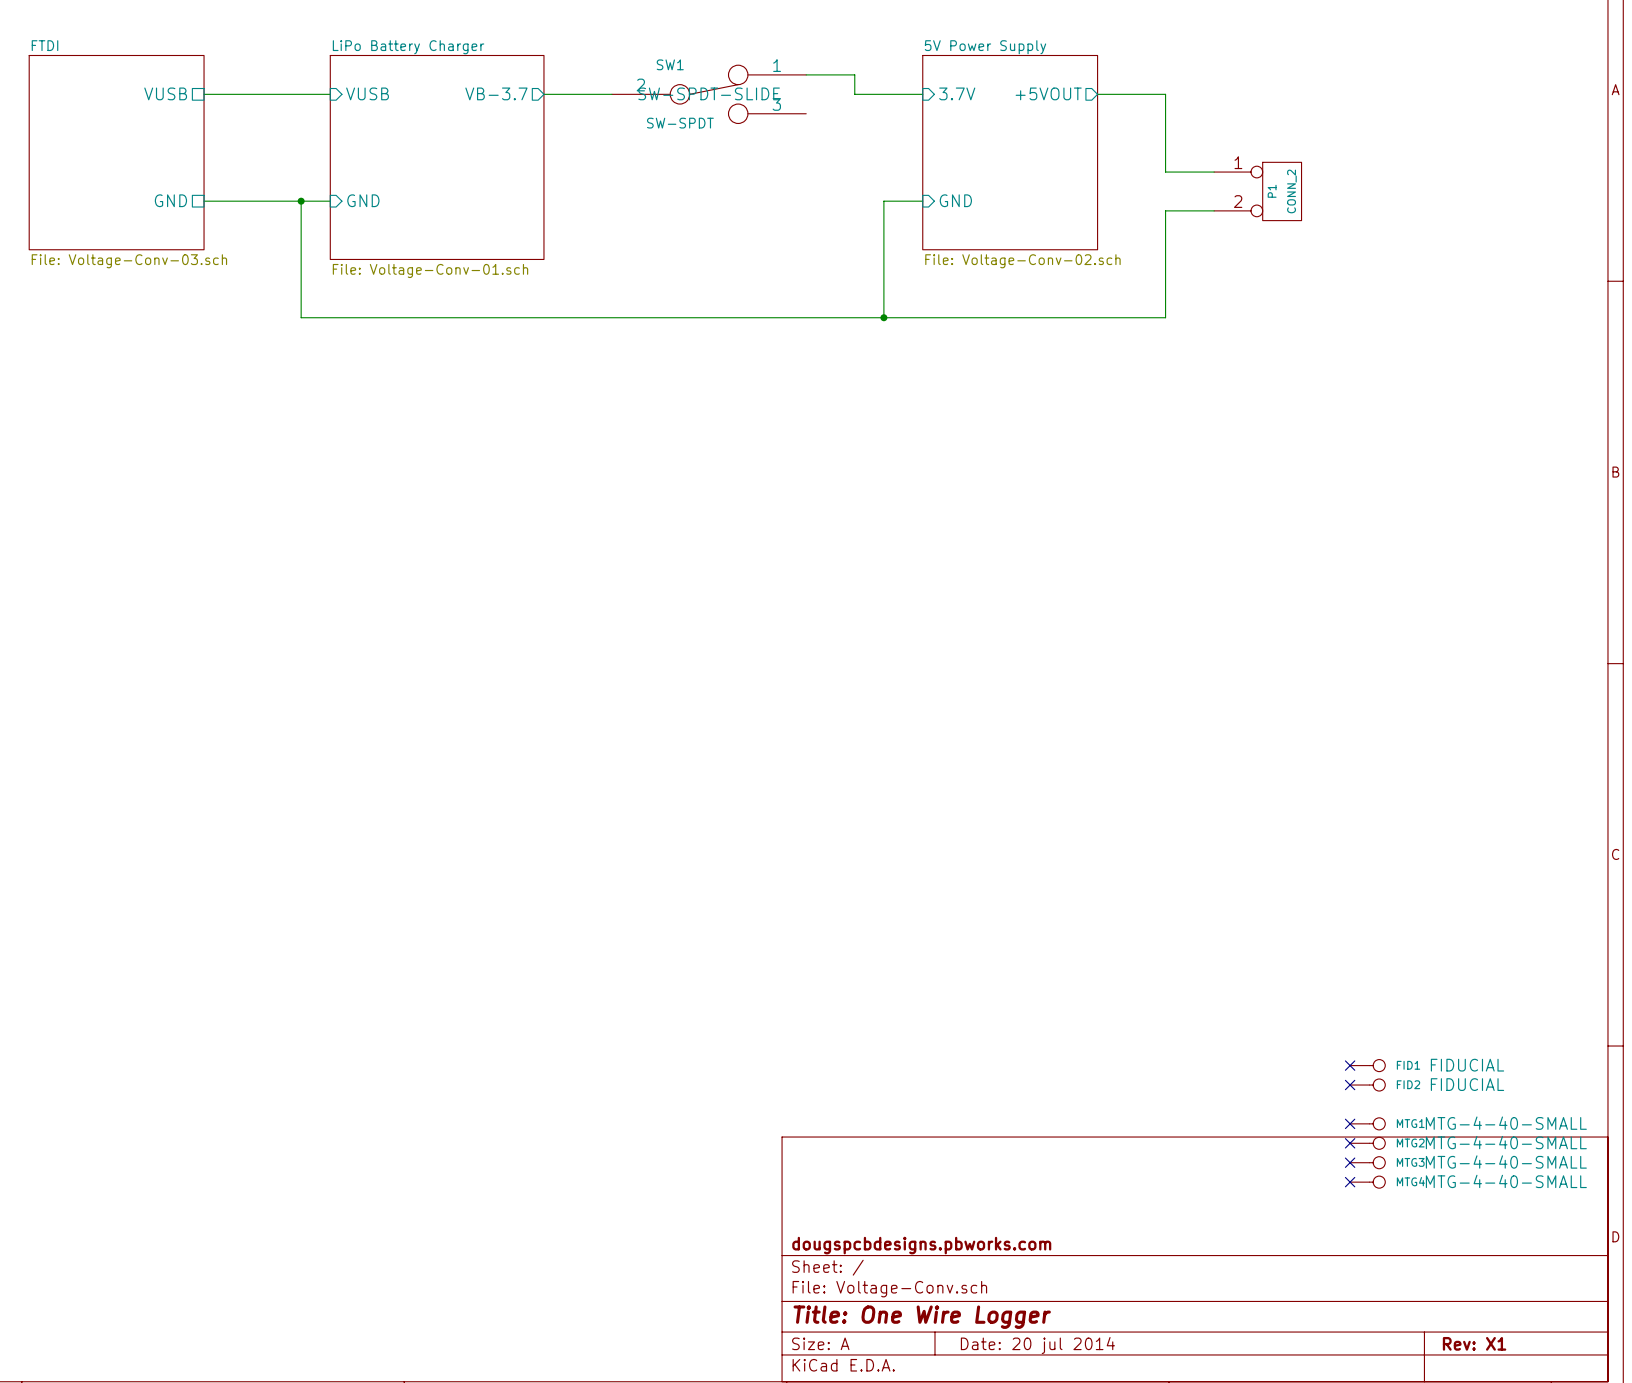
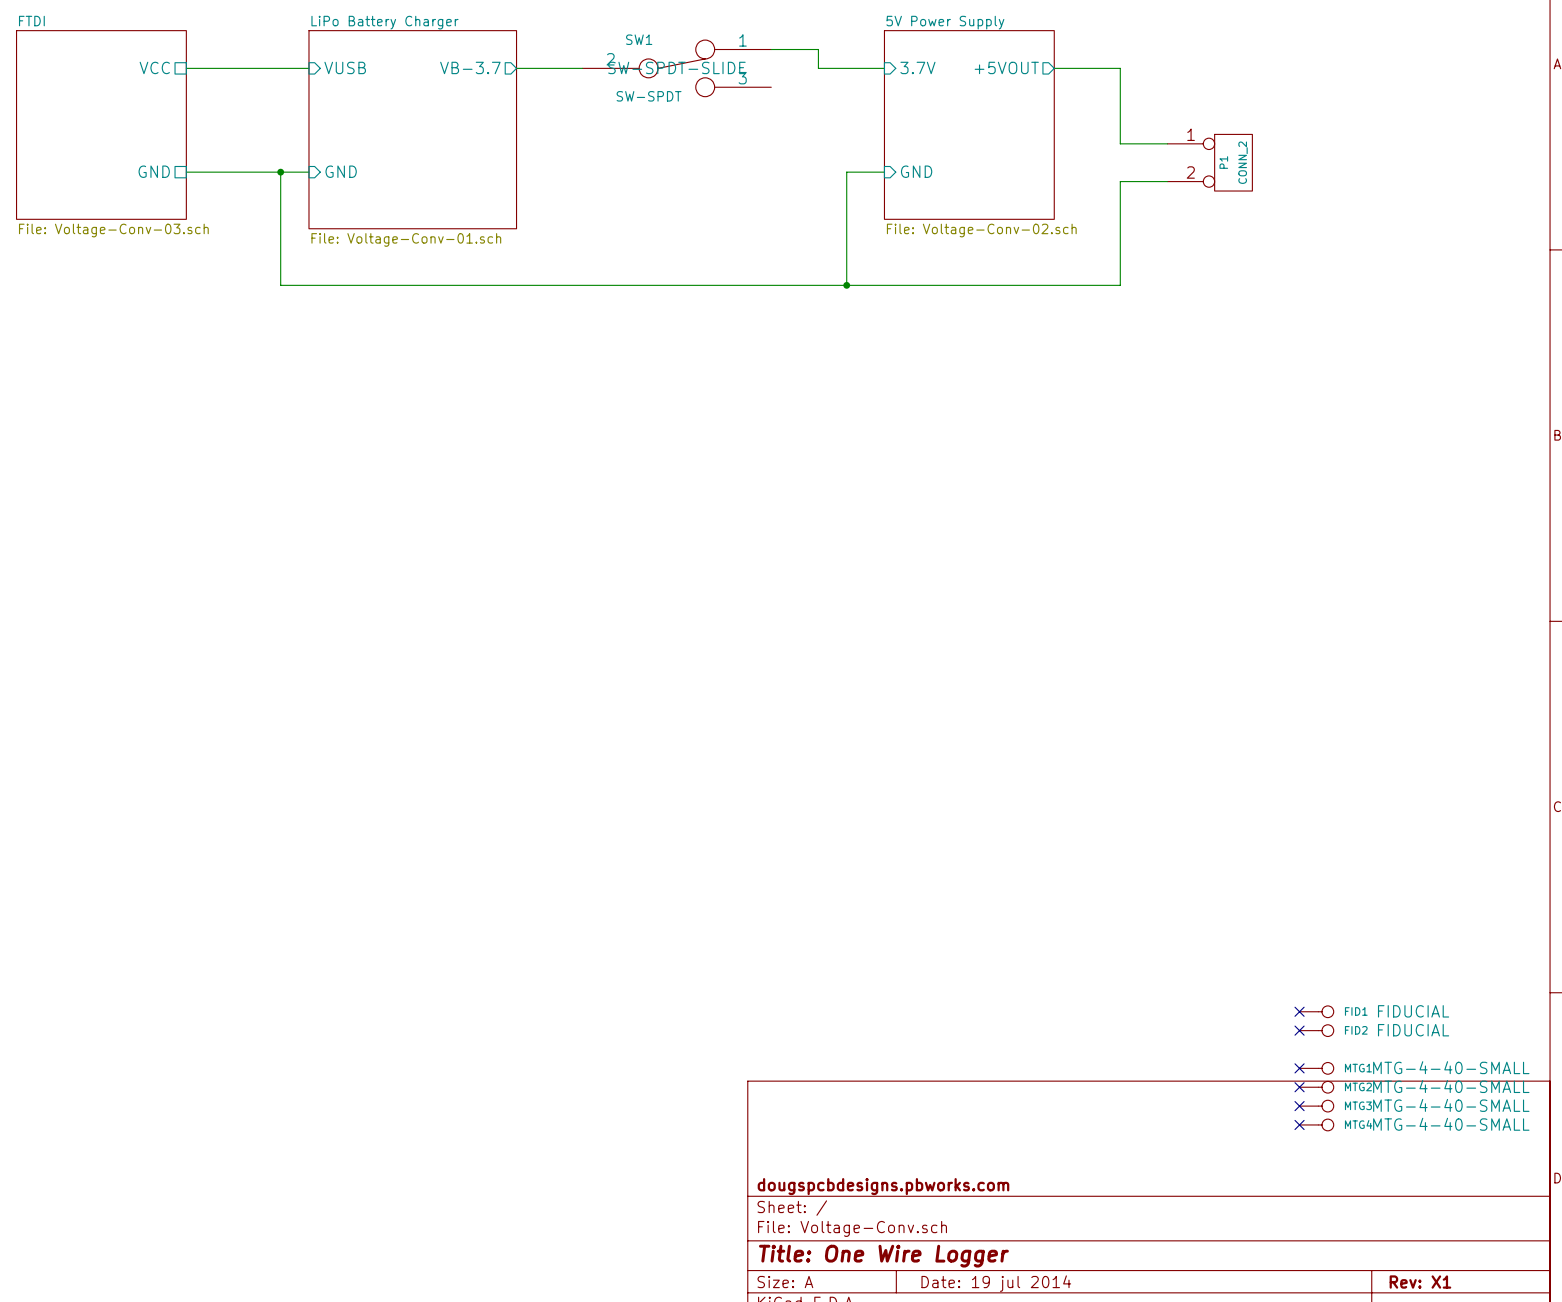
sheet pin: VUSB (165, 93) -> VCC (154, 67)
title block: Date: 20 jul 2014 (1037, 1345) -> Date: 19 jul 2014 (996, 1283)

